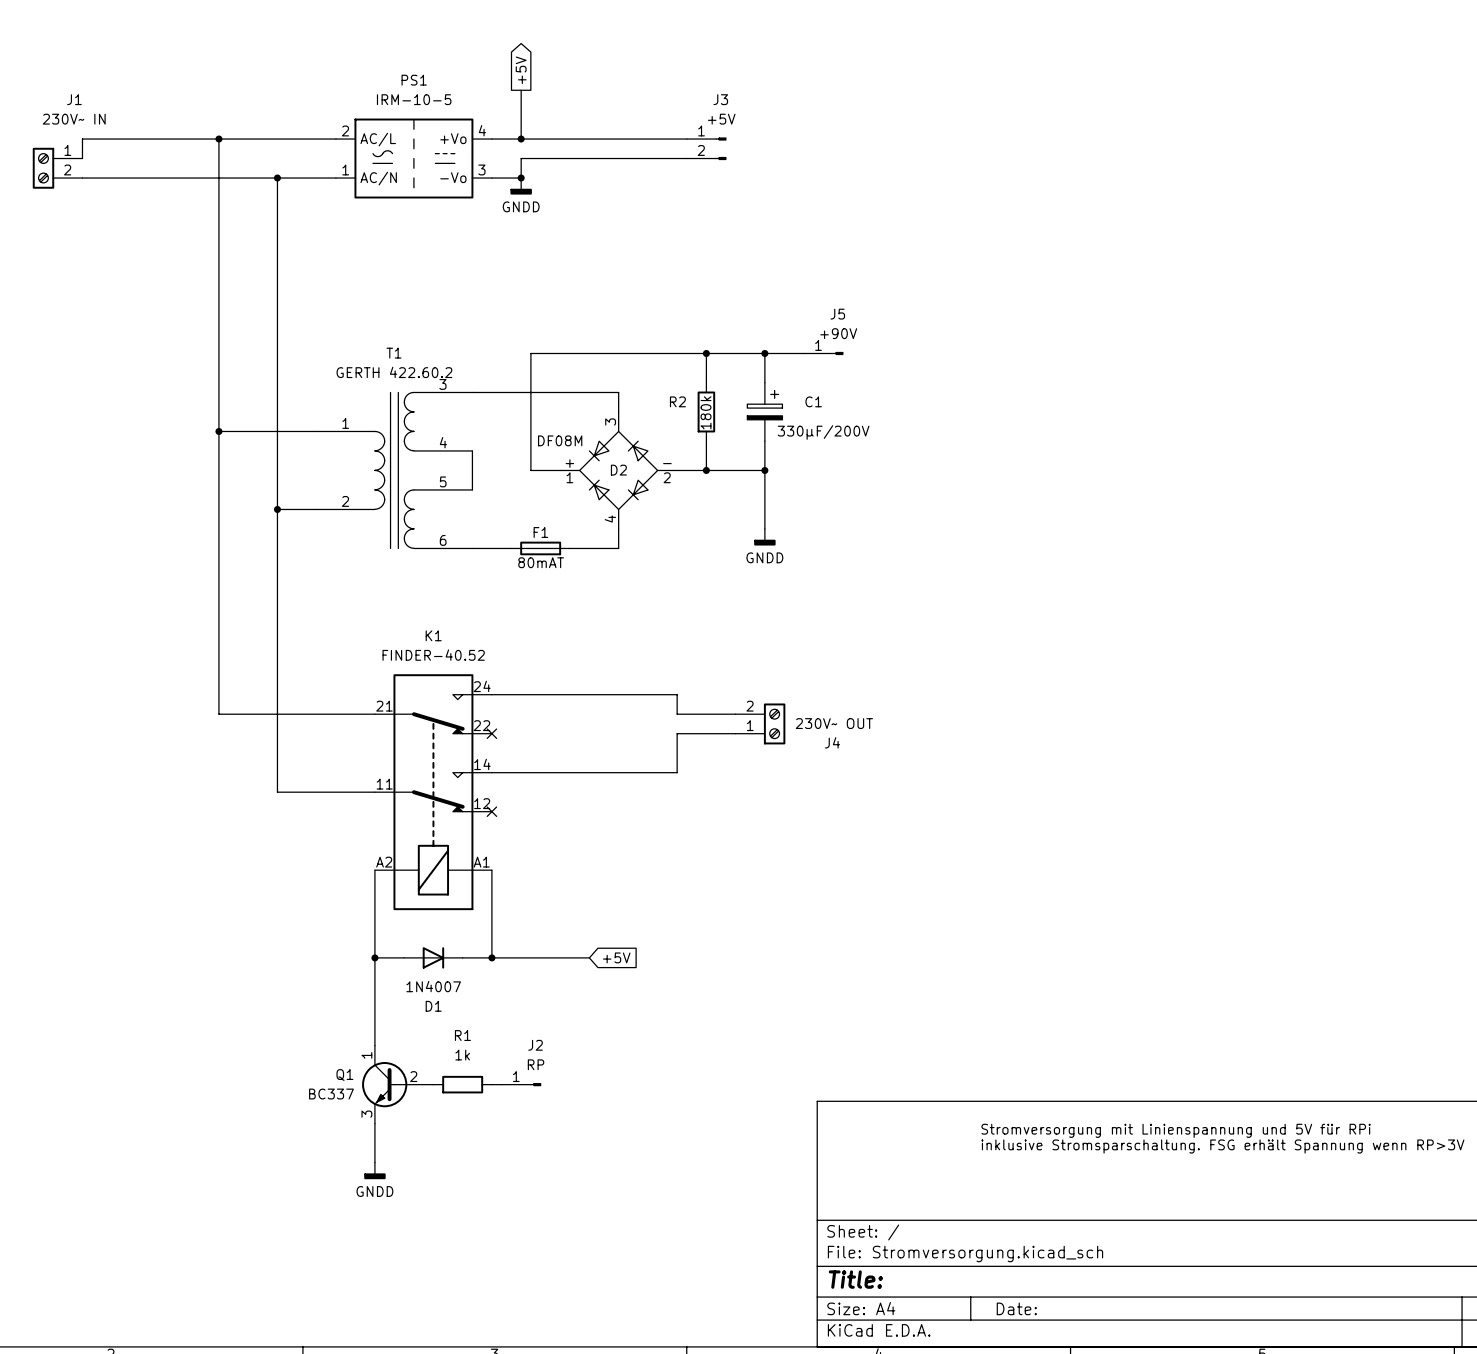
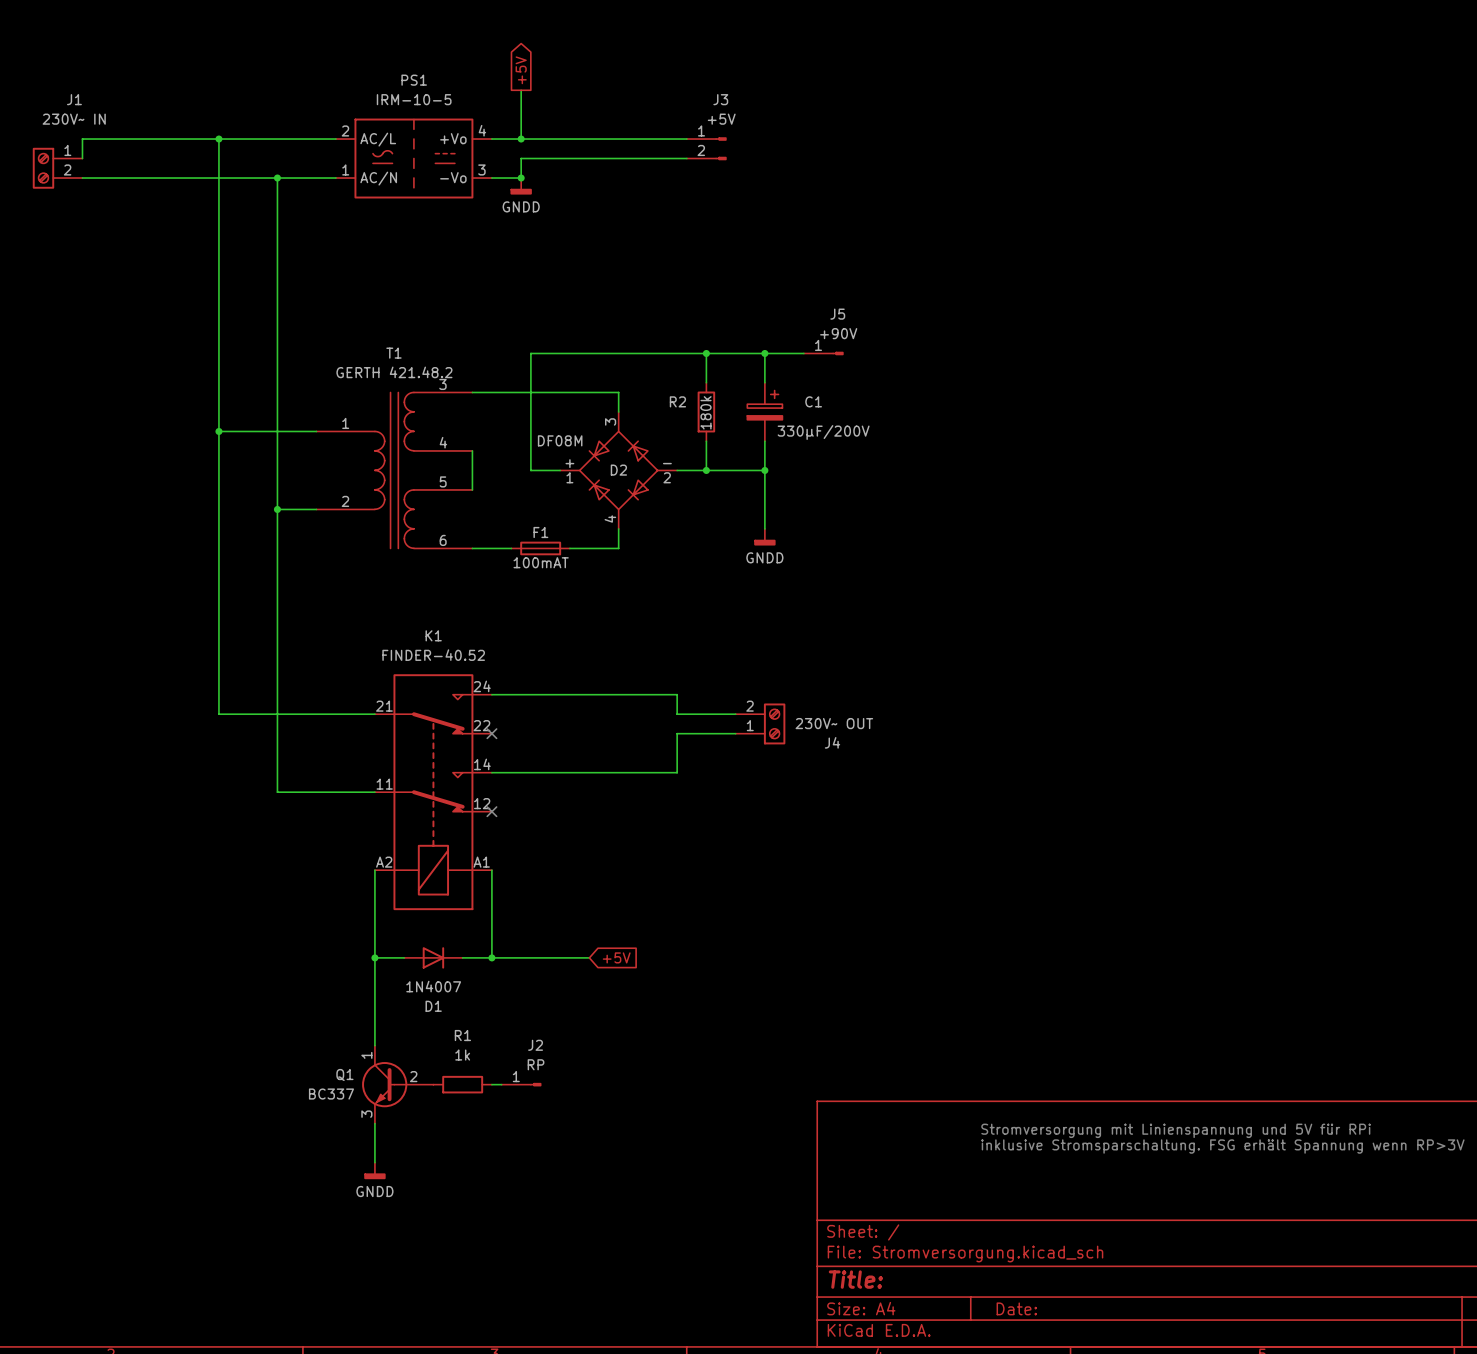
T1 value: GERTH 422.60.2 (394, 372) -> GERTH 421.48.2 (394, 372)
F1 value: 80mAT (541, 562) -> 100mAT (541, 562)

